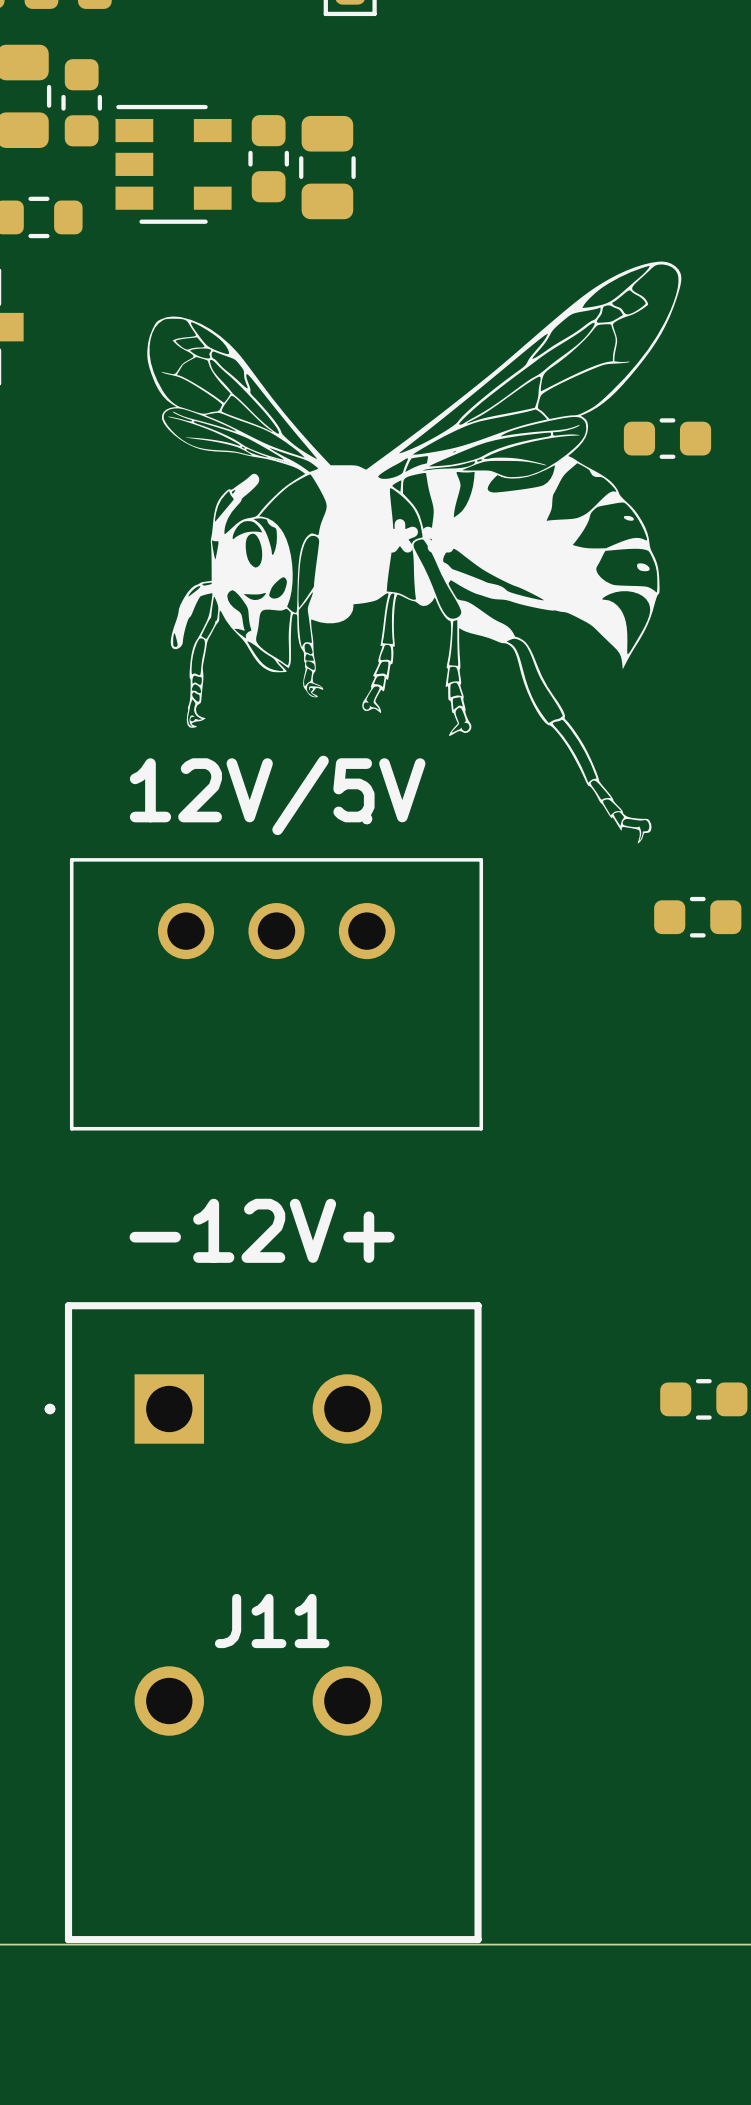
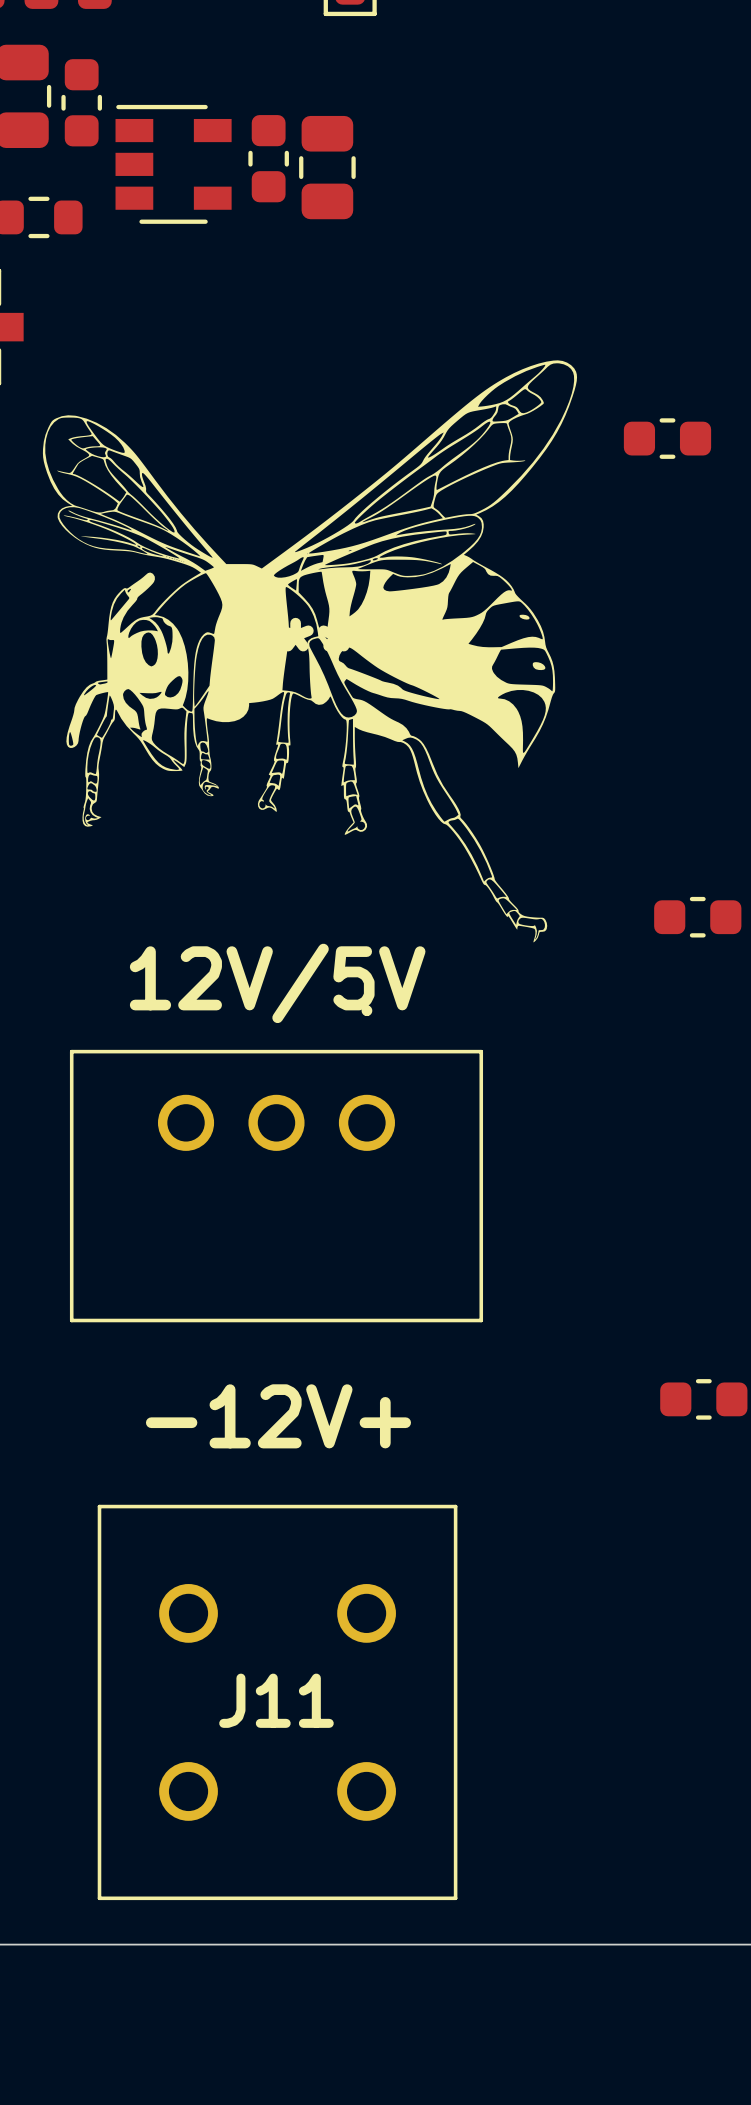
part position: (414, 552) -> (309, 651)
text position: 12V/5V (277, 795) -> 12V/5V (277, 983)
part position: (276, 972) -> (276, 1163)
text position: -12V+ (262, 1230) -> -12V+ (278, 1416)
J11 footprint: [44, 1302, 482, 1944] -> [97, 1504, 458, 1901]

